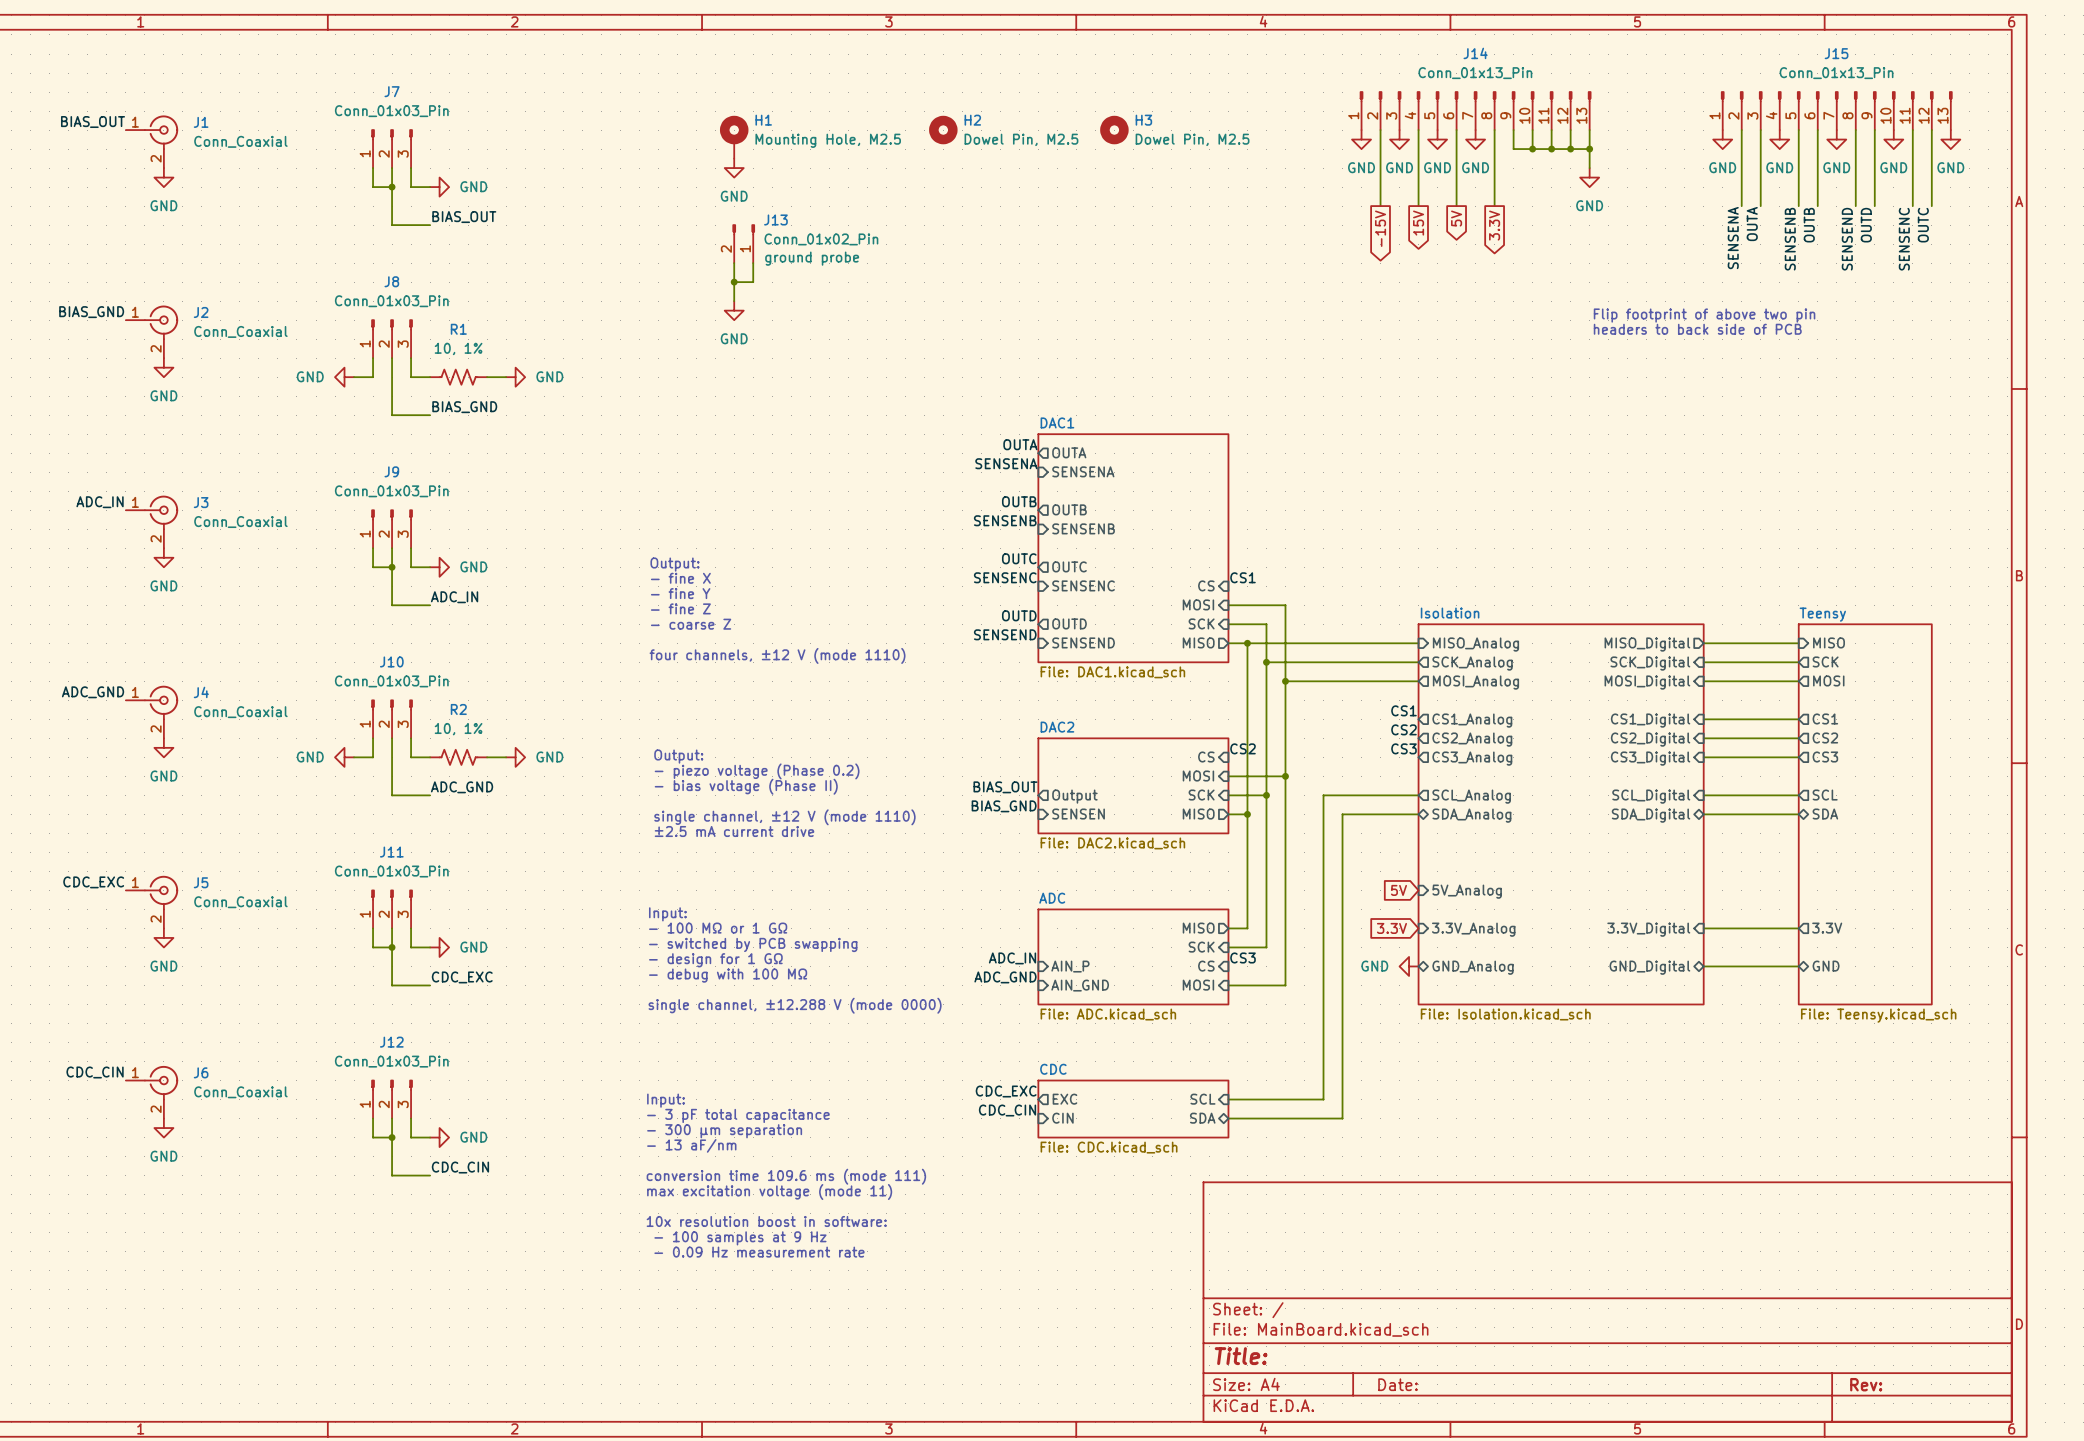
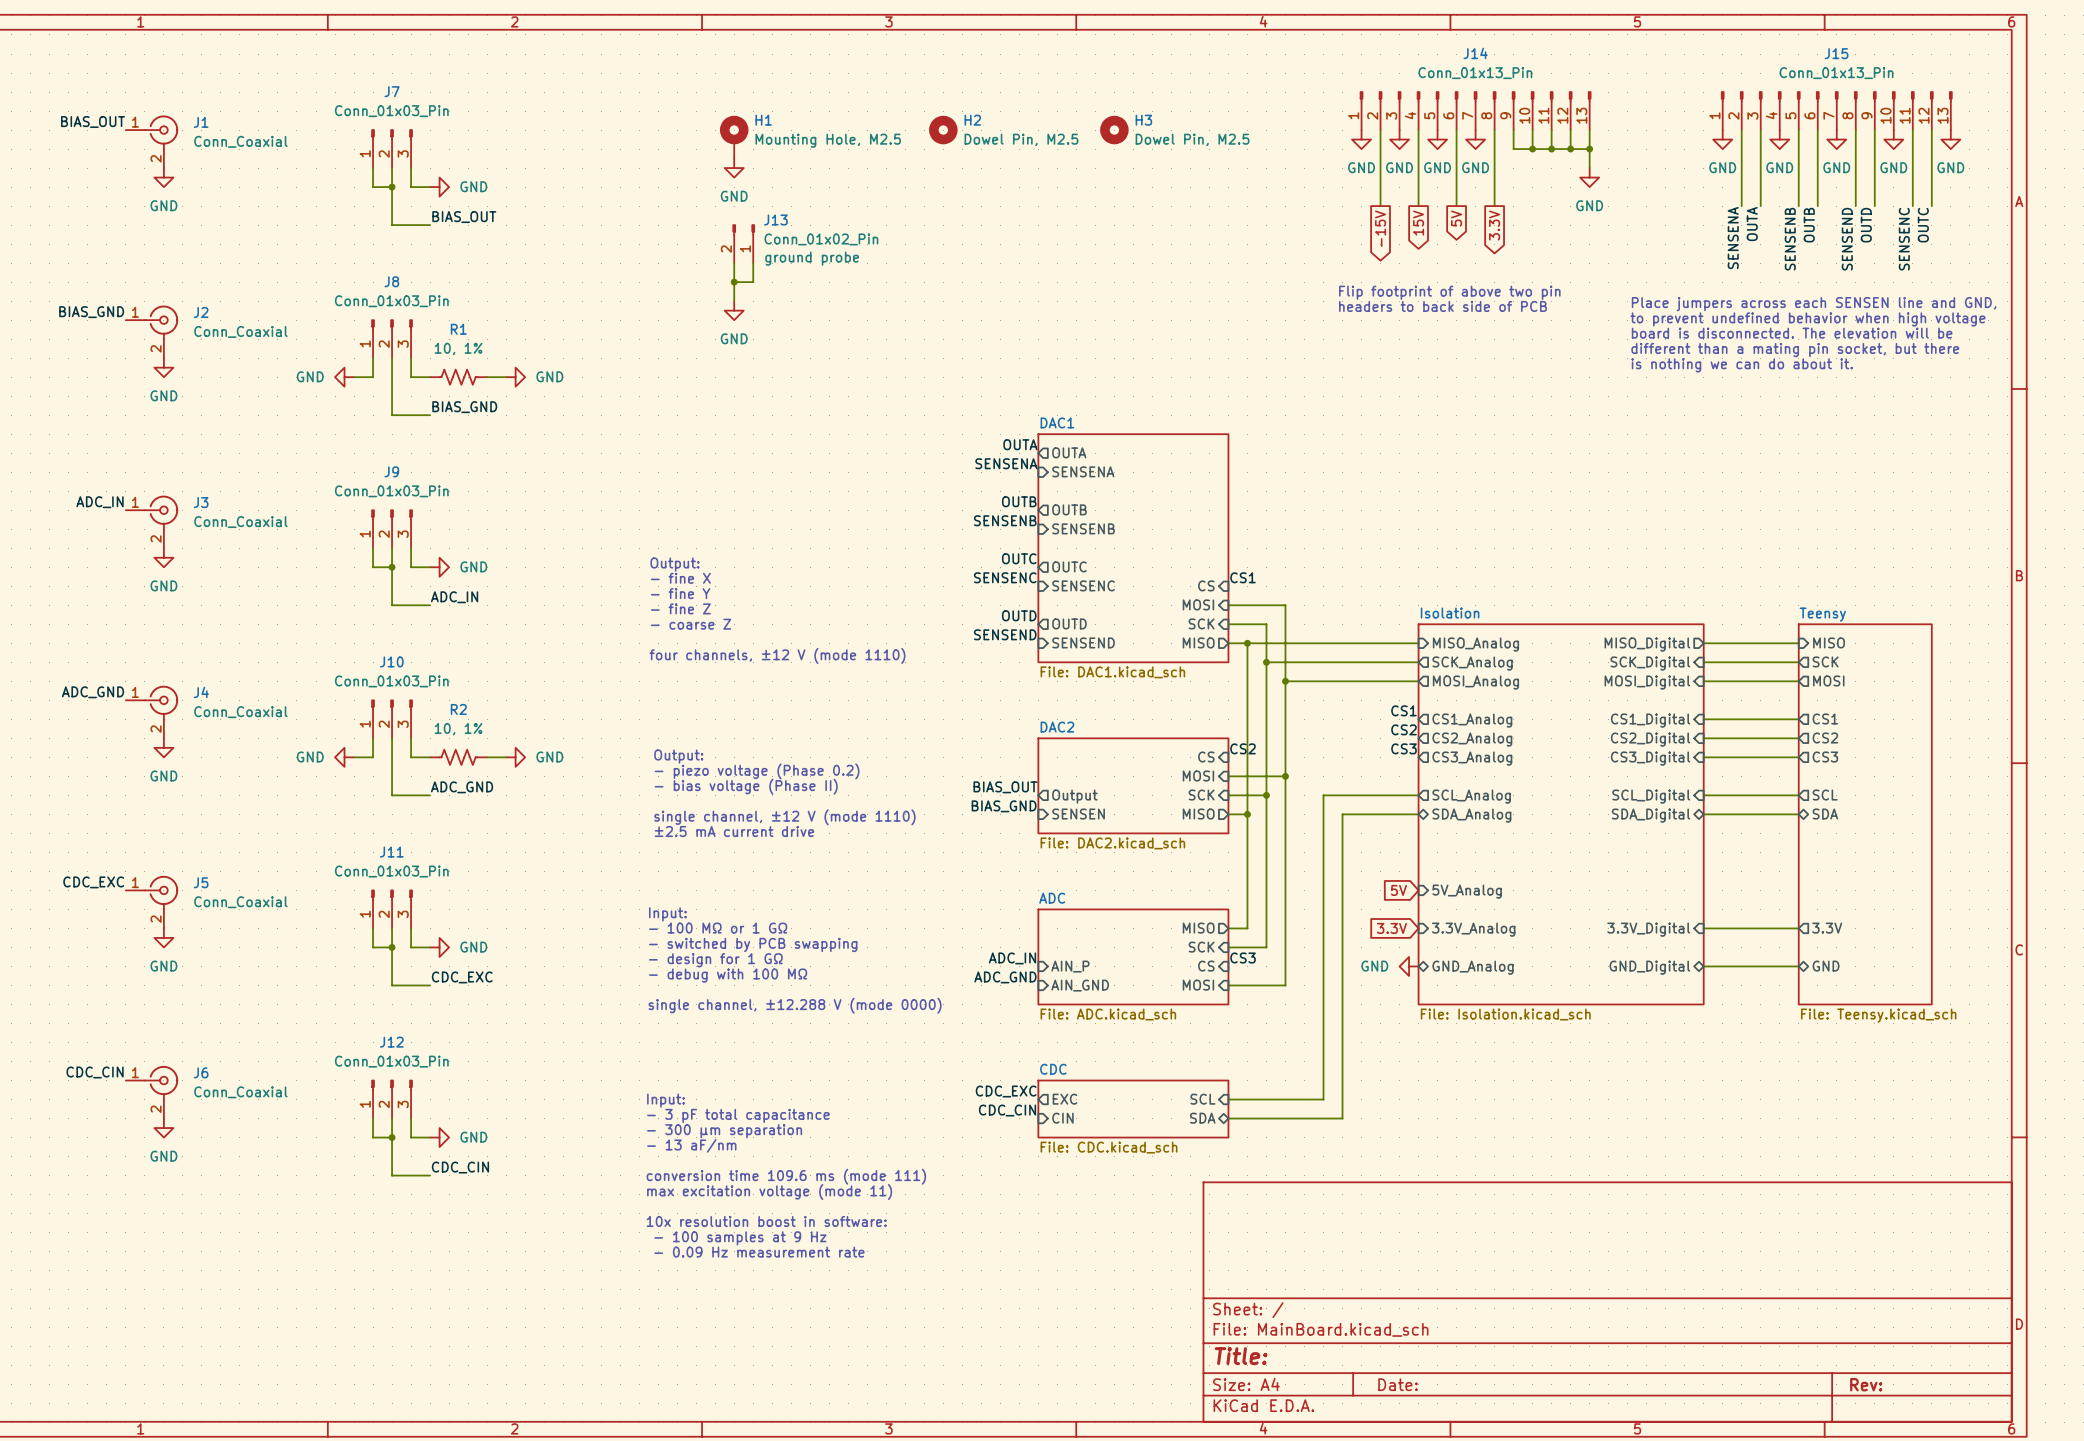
text: none -> Flip footprint of above two pin (1449, 292)
text: none -> Place jumpers across each SENSEN line and GND, (1814, 304)
text: none -> headers to back side of PCB (1443, 306)
text: Flip footprint of above two pin (1704, 315) -> none
text: none -> to prevent undefined behavior when high voltage (1807, 319)
text: headers to back side of PCB (1697, 329) -> none
text: none -> board is disconnected. The elevation will be (1792, 333)
text: none -> different than a mating pin socket, but there (1795, 350)
text: none -> is nothing we can do about it. (1742, 365)

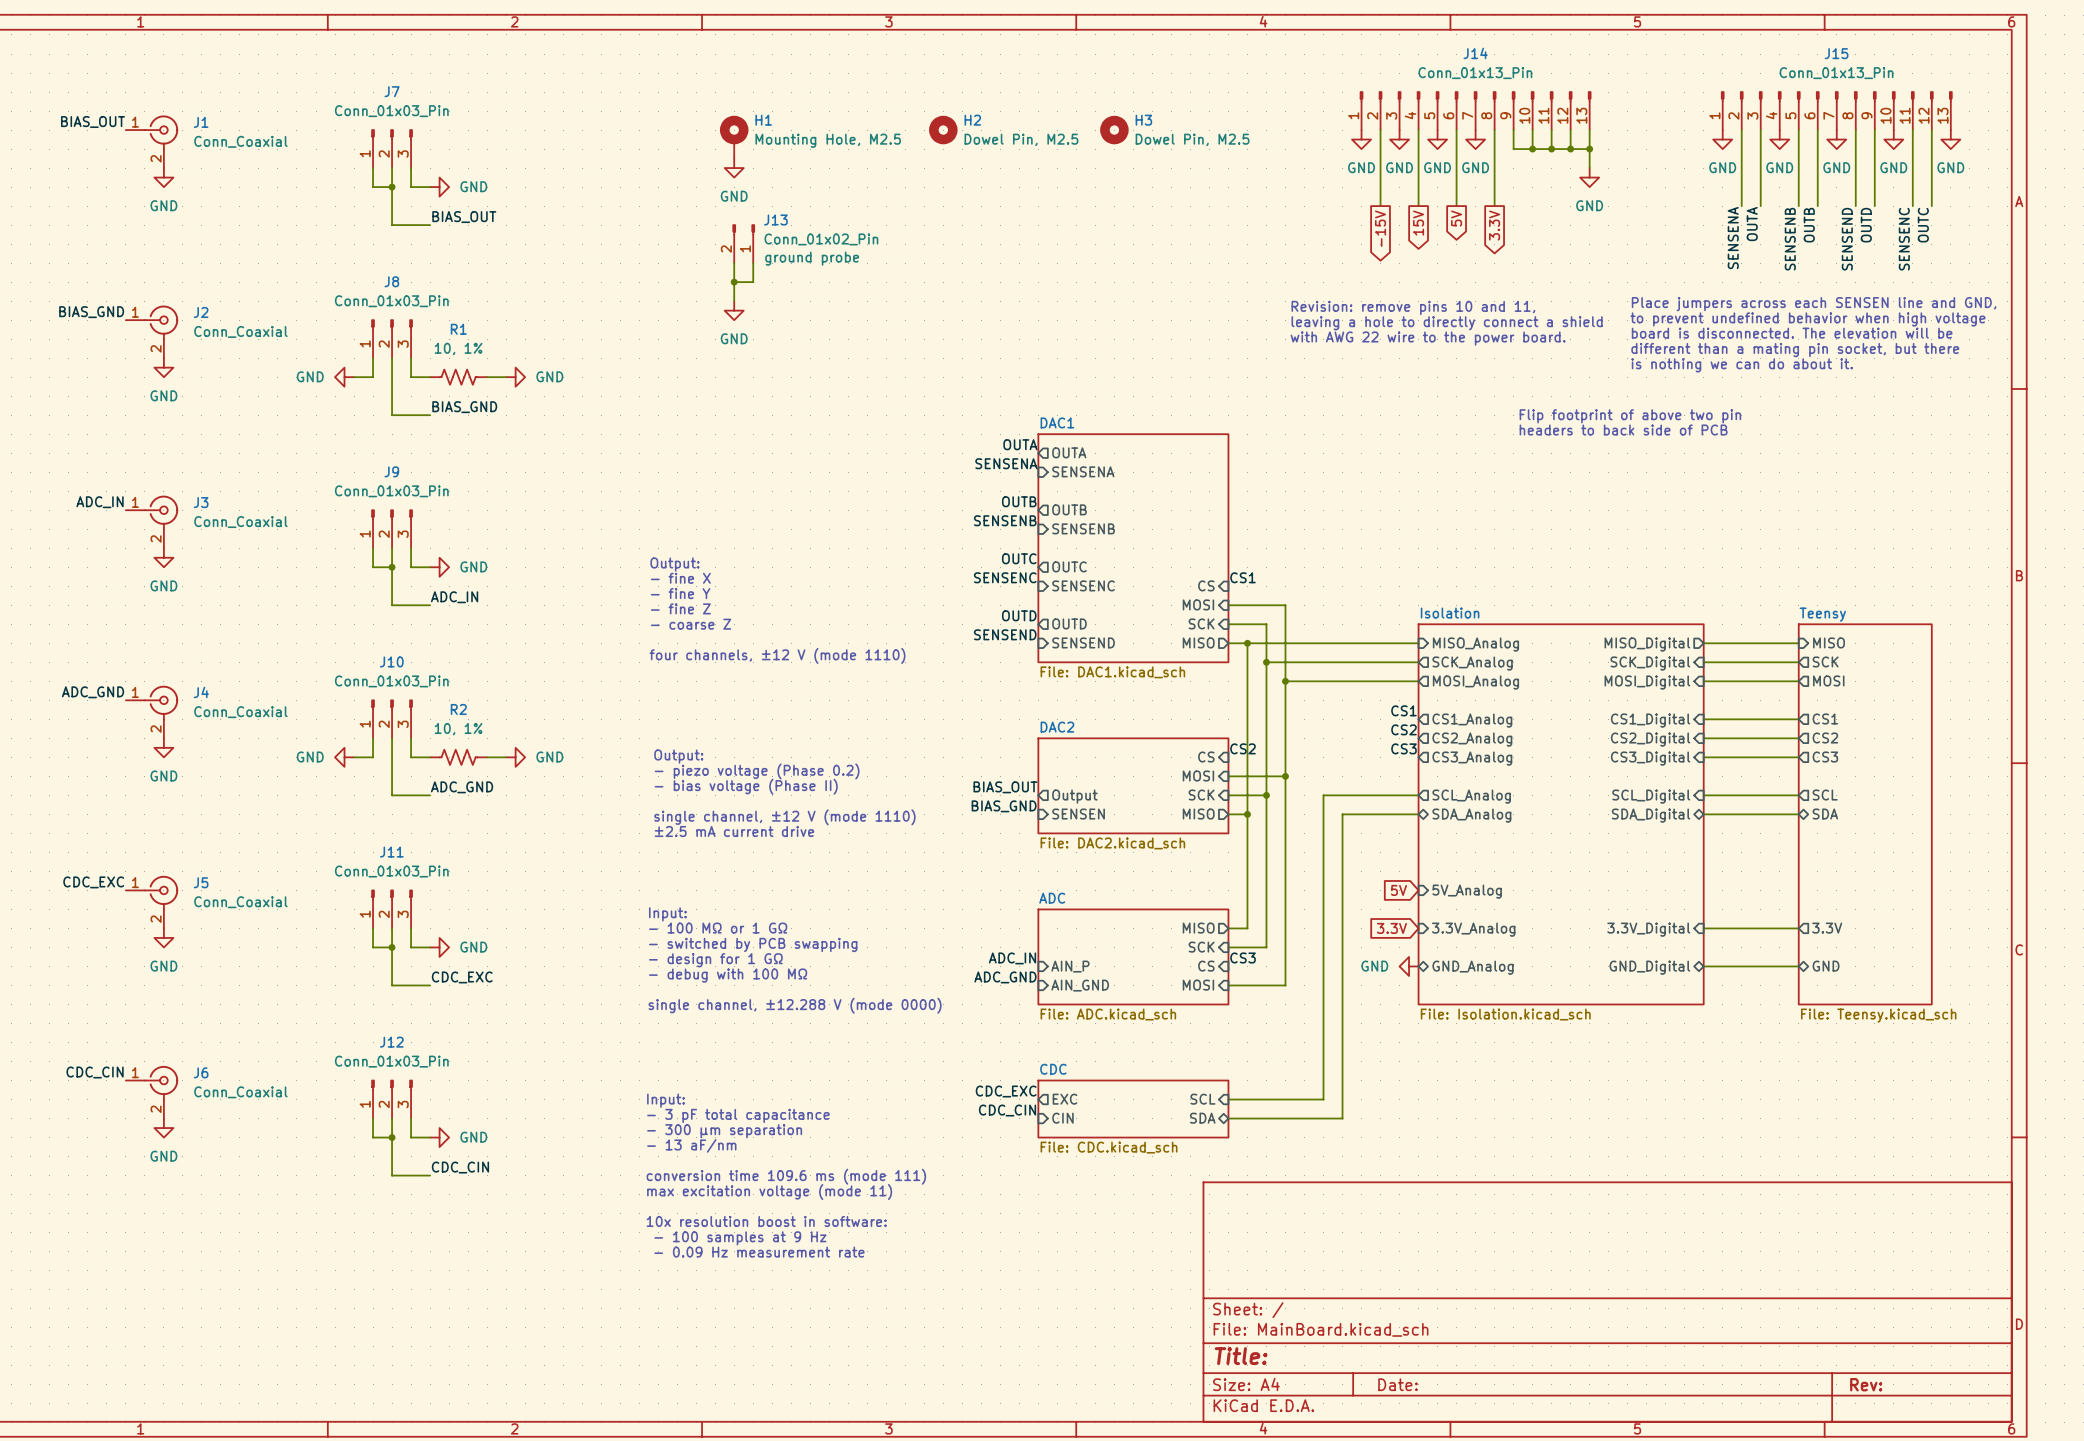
text: Flip footprint of above two pin (1449, 292) -> none
text: headers to back side of PCB (1443, 306) -> none
text: none -> Revision: remove pins 10 and 11, (1413, 307)
text: none -> leaving a hole to directly connect a shield (1447, 323)
text: none -> with AWG 22 wire to the power board. (1428, 338)
text: none -> Flip footprint of above two pin (1630, 416)
text: none -> headers to back side of PCB (1623, 430)

